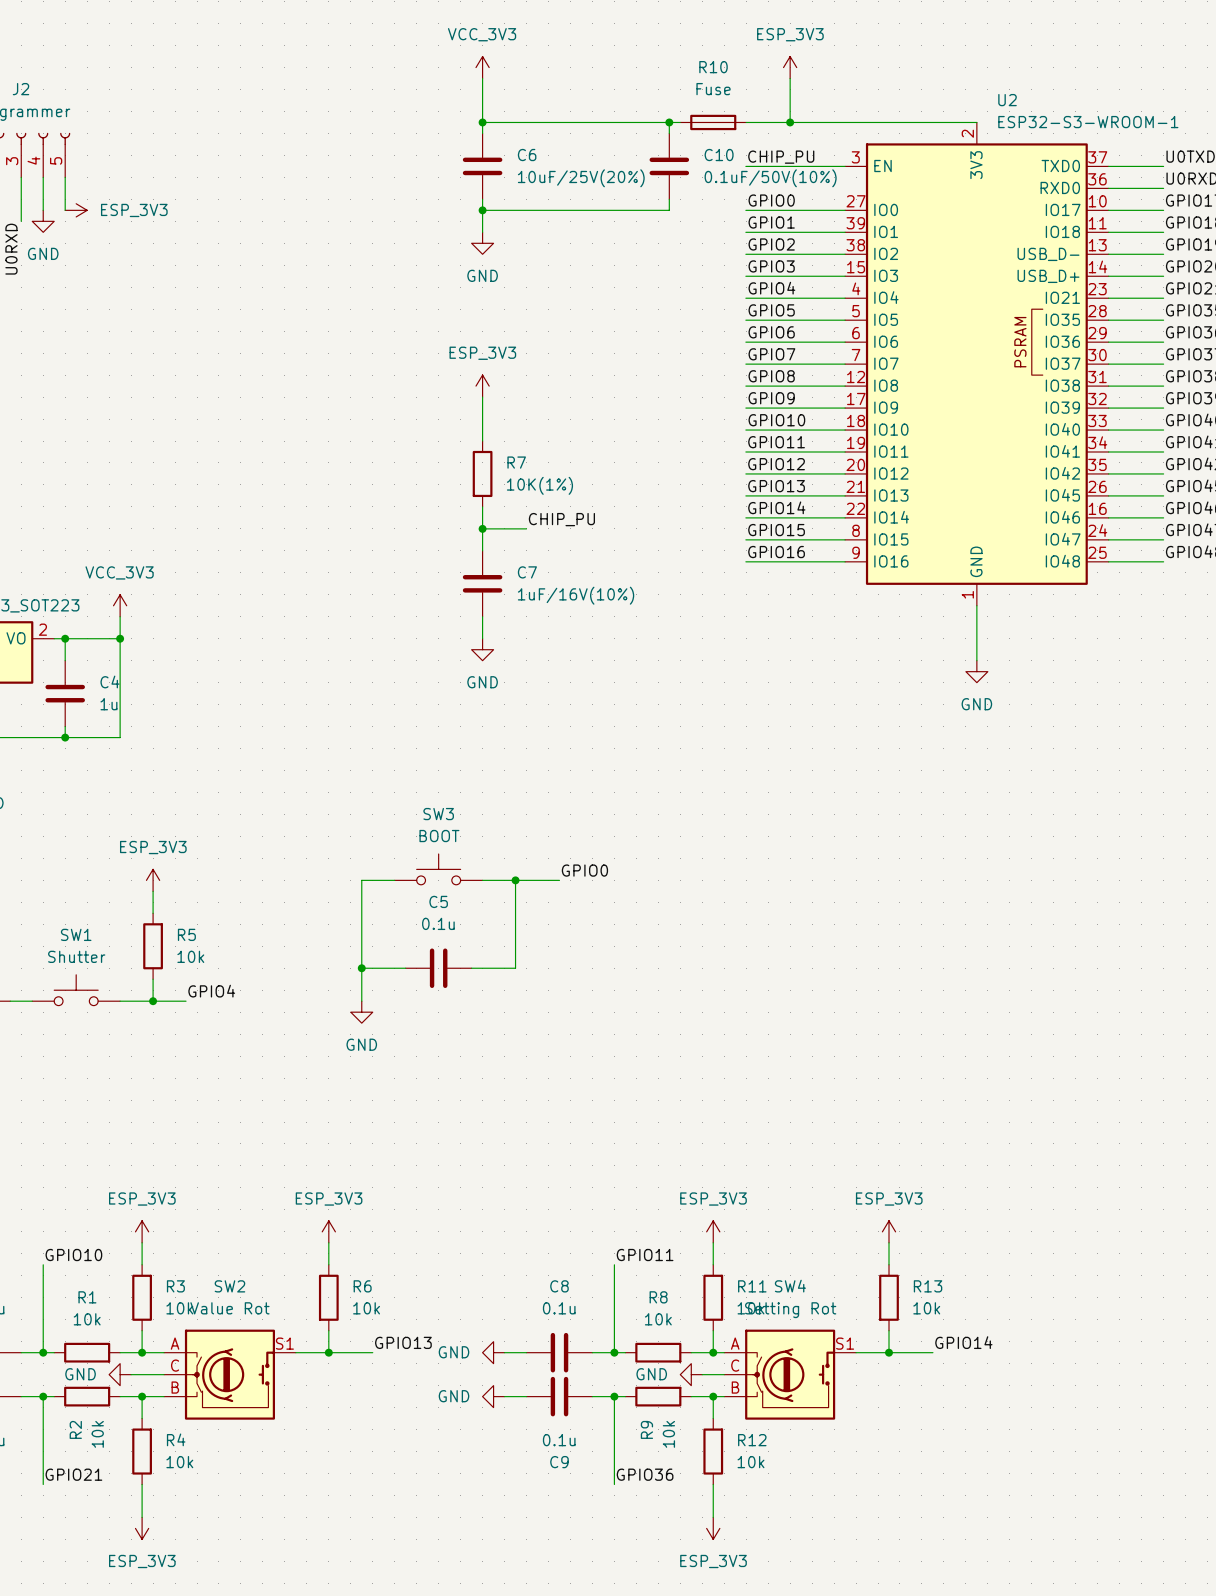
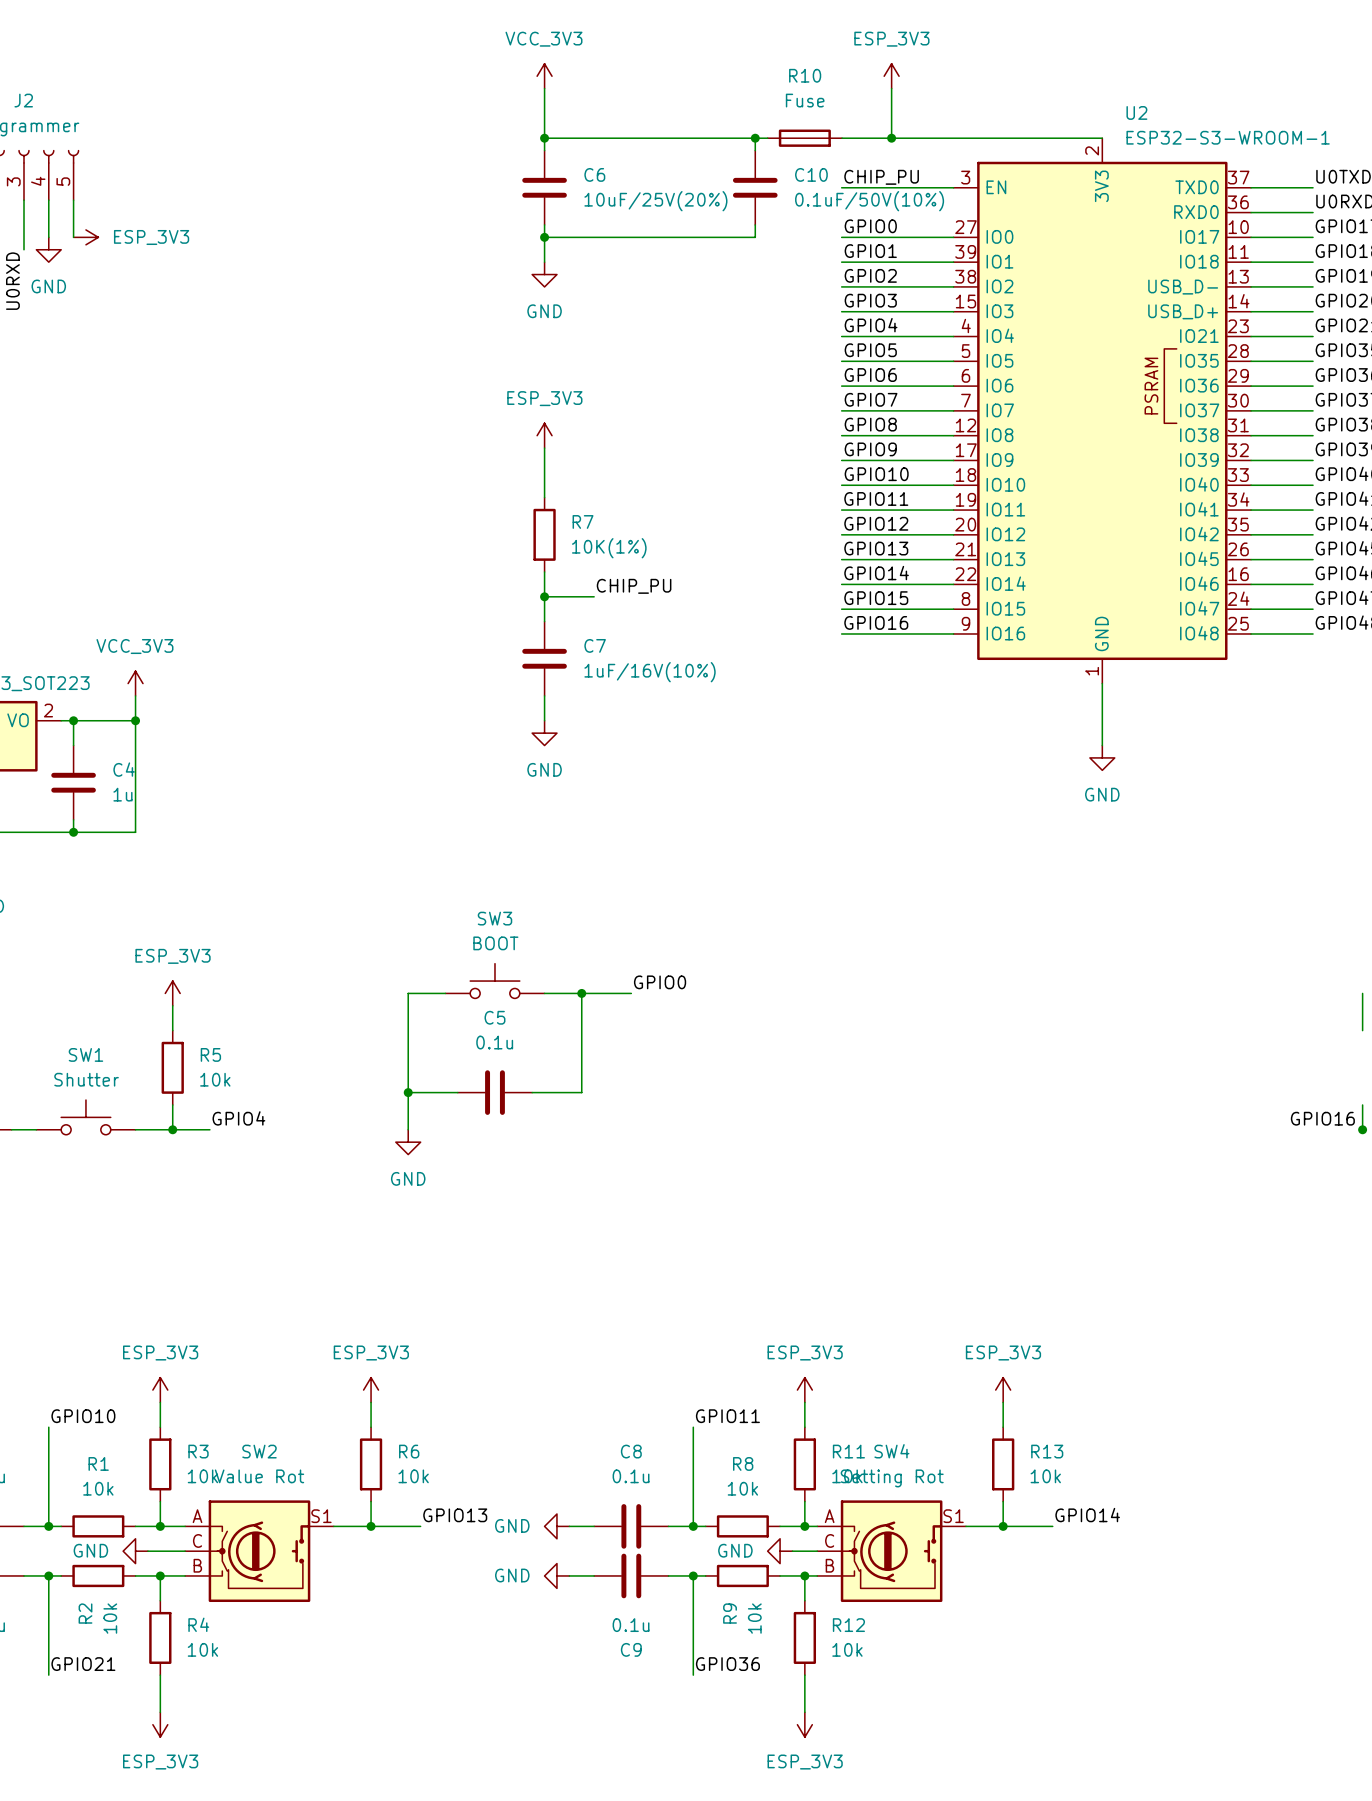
wire: none -> (1362, 993) (1362, 1030)
wire: none -> (1362, 1104) (1362, 1129)
label: none -> GPIO16 (1322, 1118)
junction: none -> (1362, 1129)

